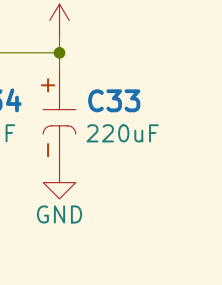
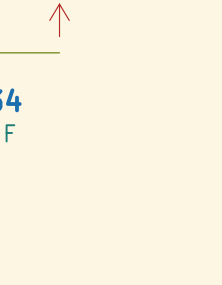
wire: (59, 36) (59, 69) -> none
junction: (59, 52) -> none
C33: 220uF (59, 117) -> none
power symbol: GND (59, 182) -> none

